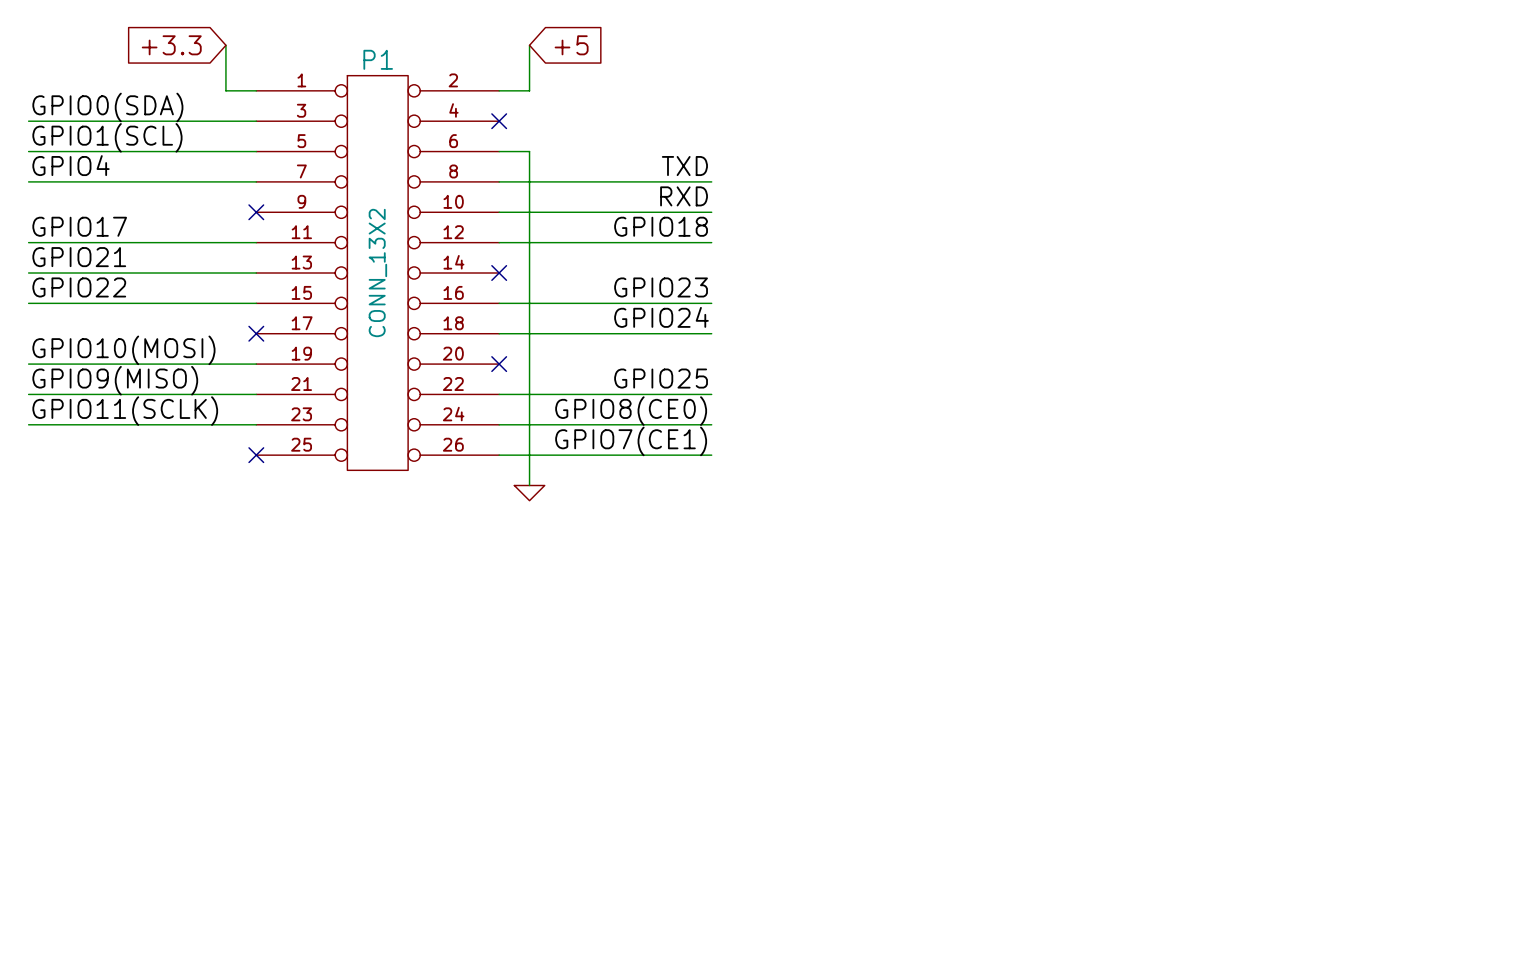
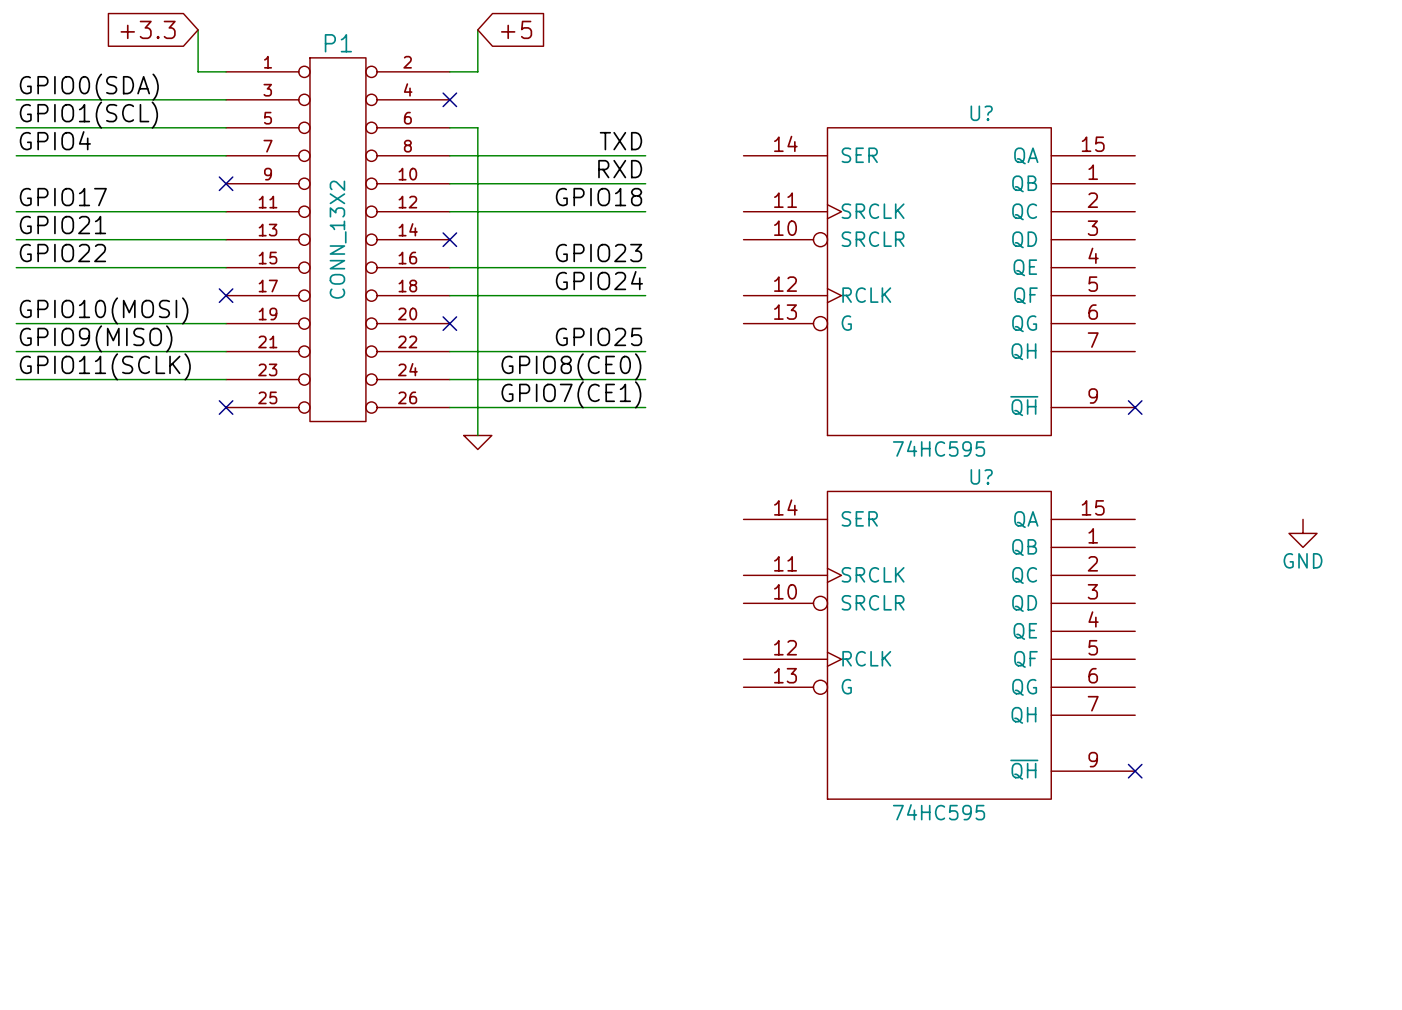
U?: none -> 74HC595 (939, 281)
no-connect mark: none -> (1135, 407)
power symbol: none -> GND (1303, 533)
U?: none -> 74HC595 (939, 645)
no-connect mark: none -> (1135, 771)

